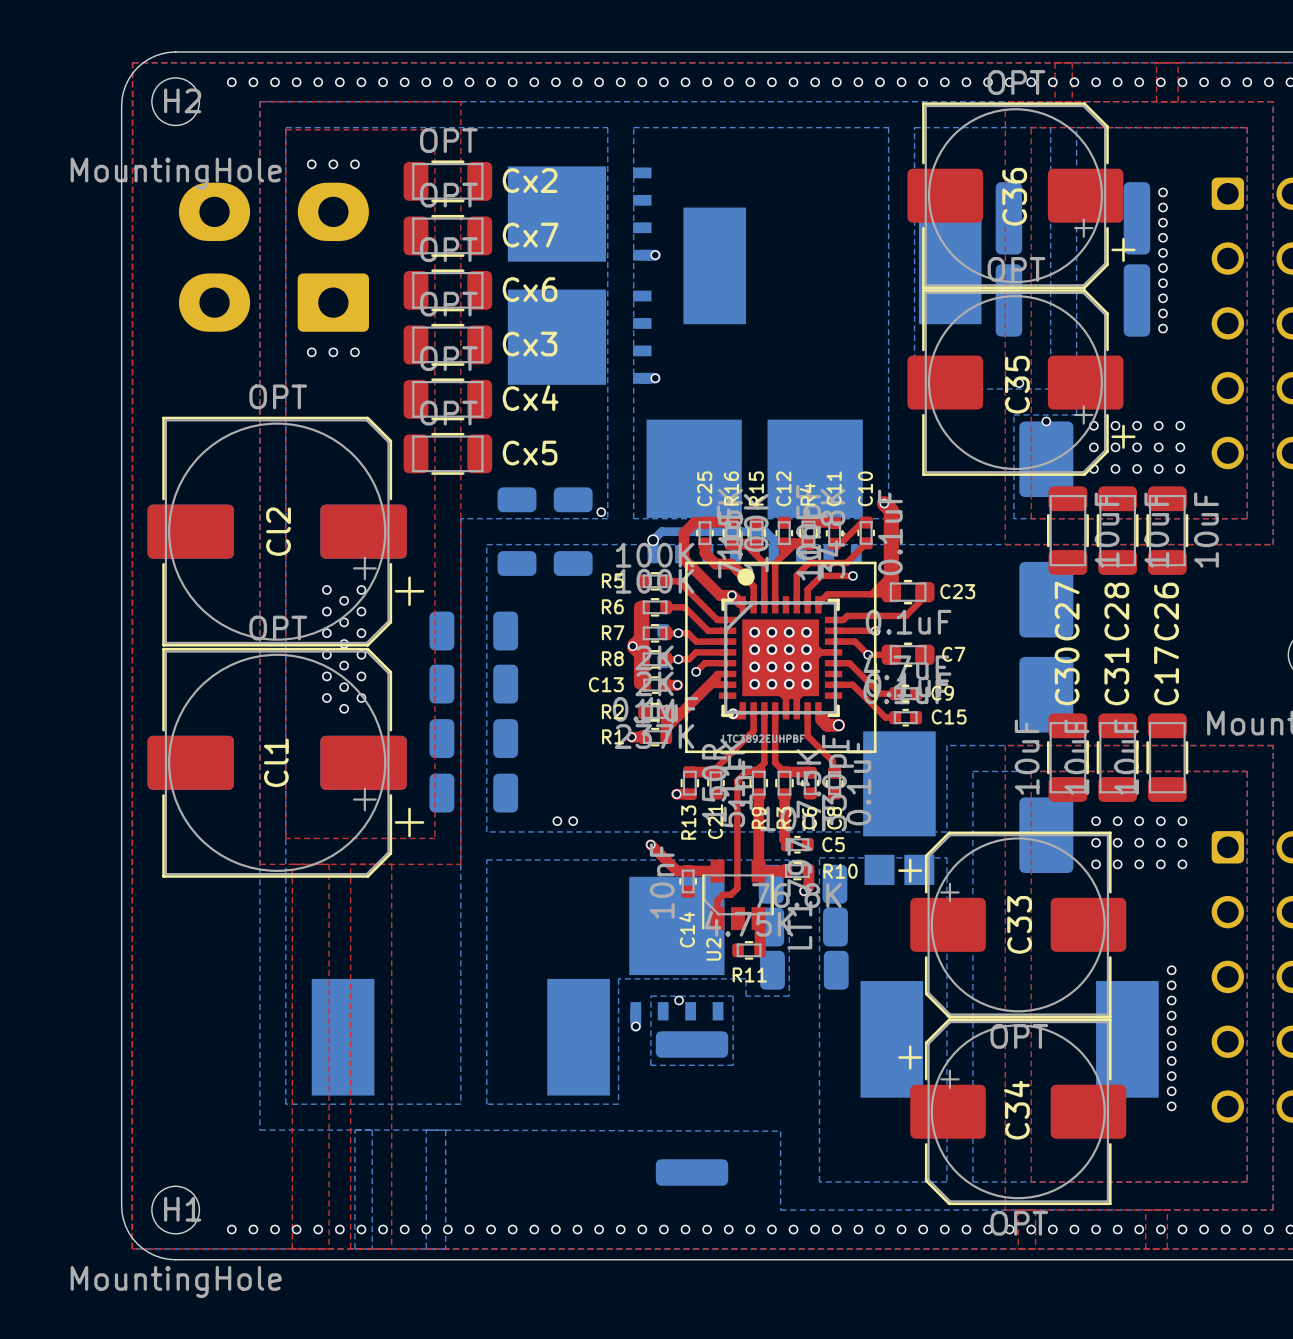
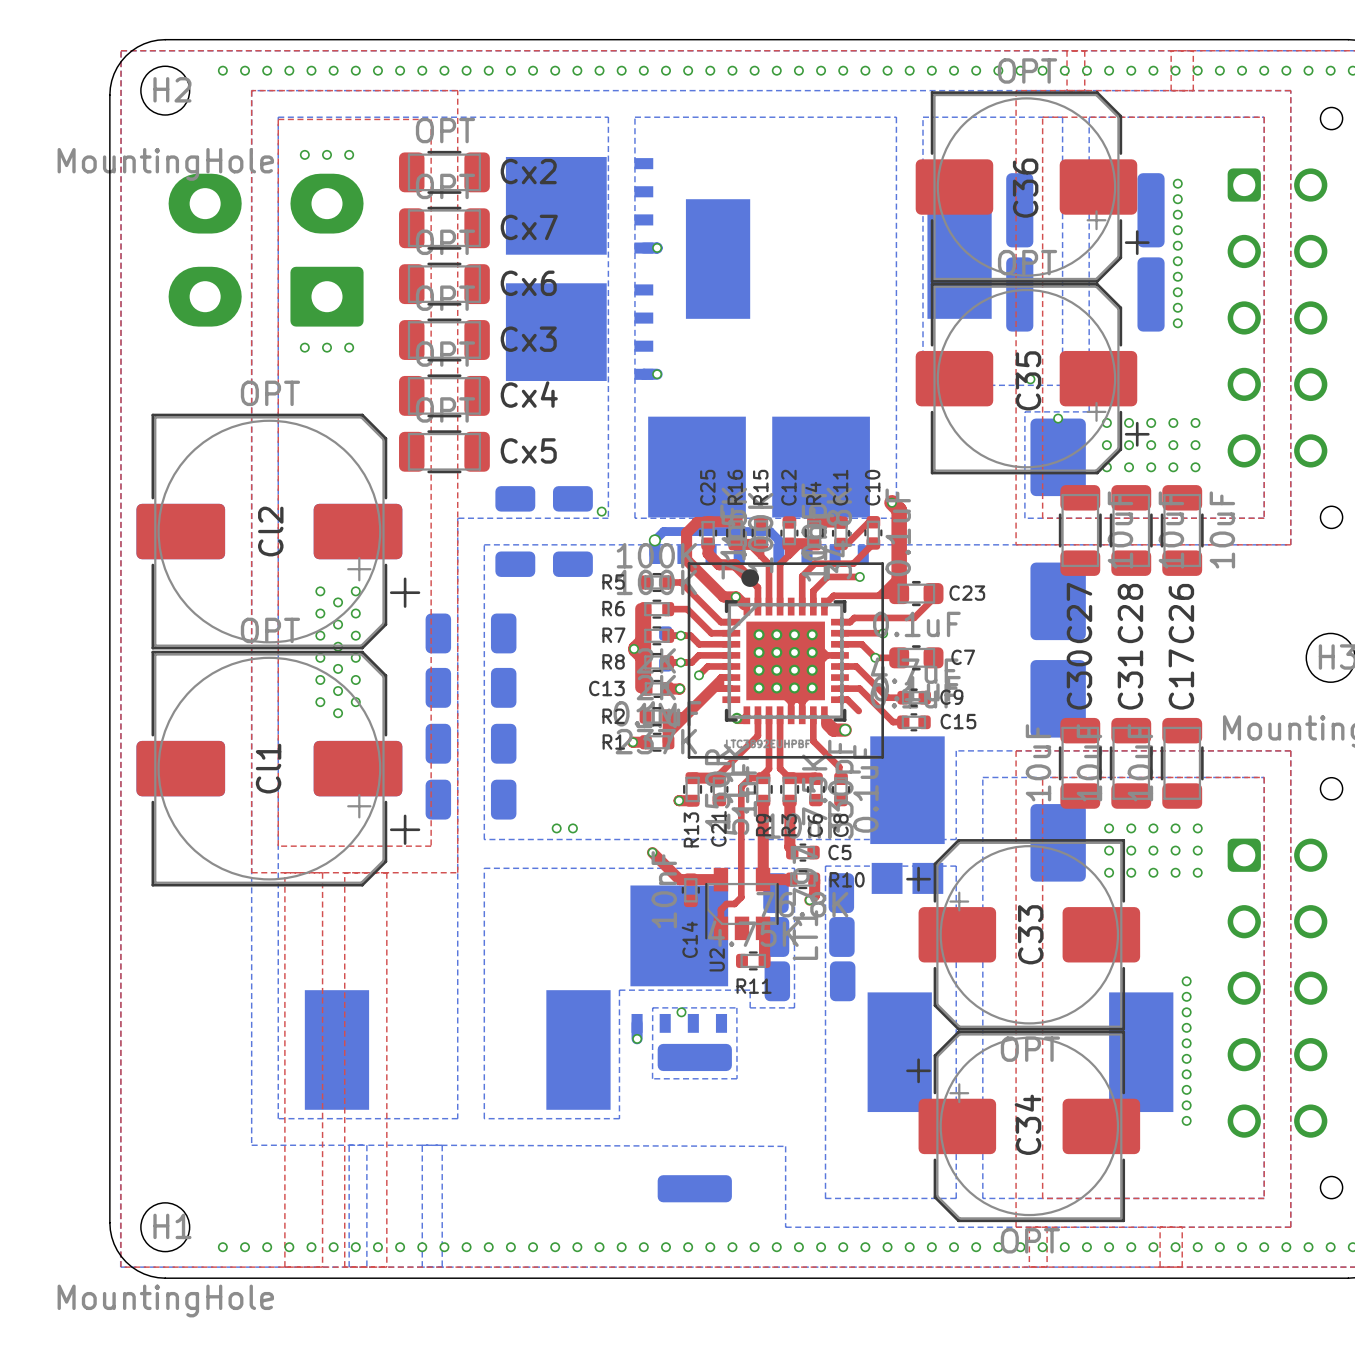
top track: none -> (842, 699) (847, 699) (858, 711)

